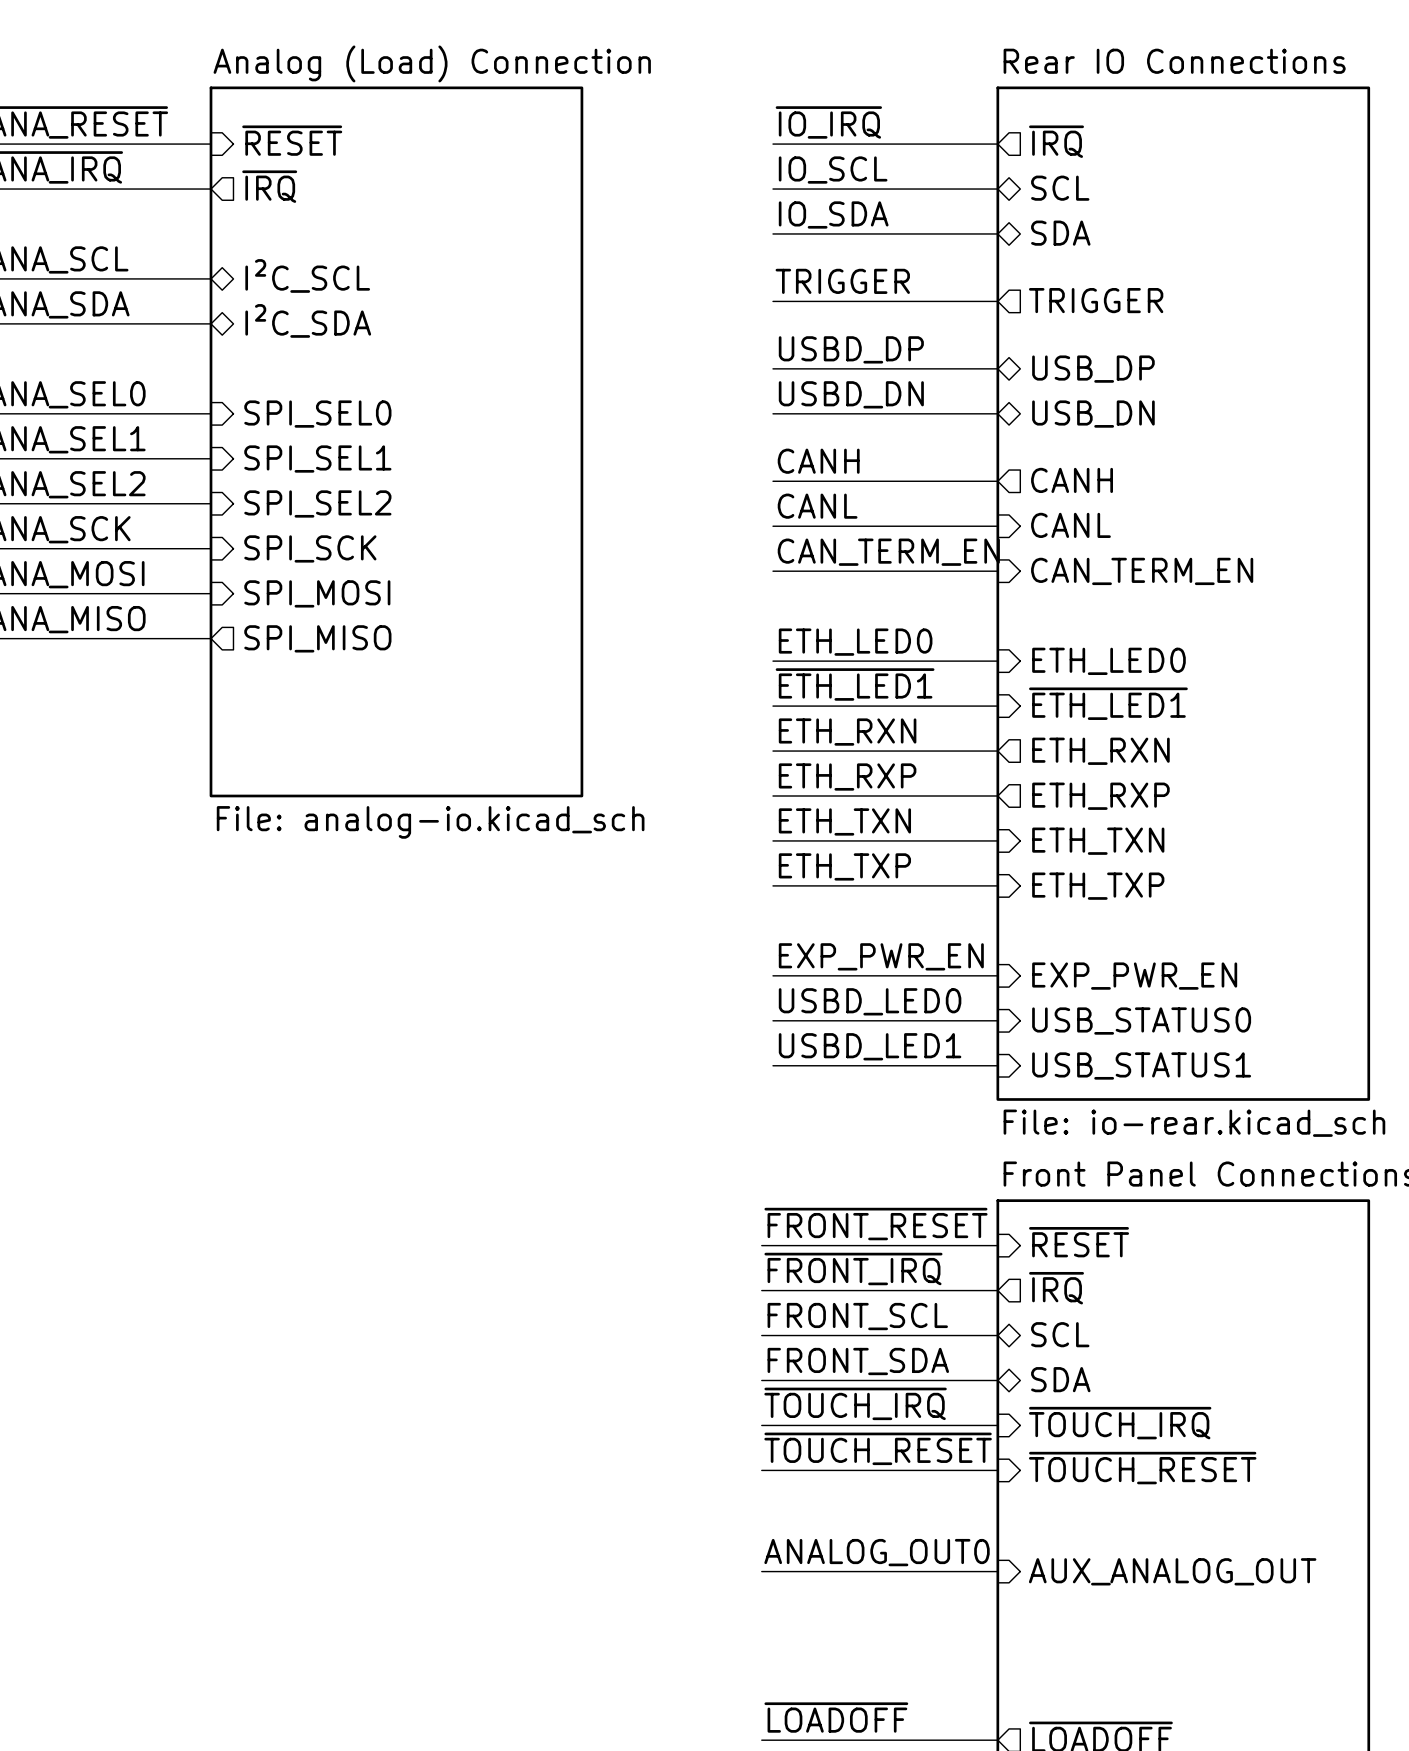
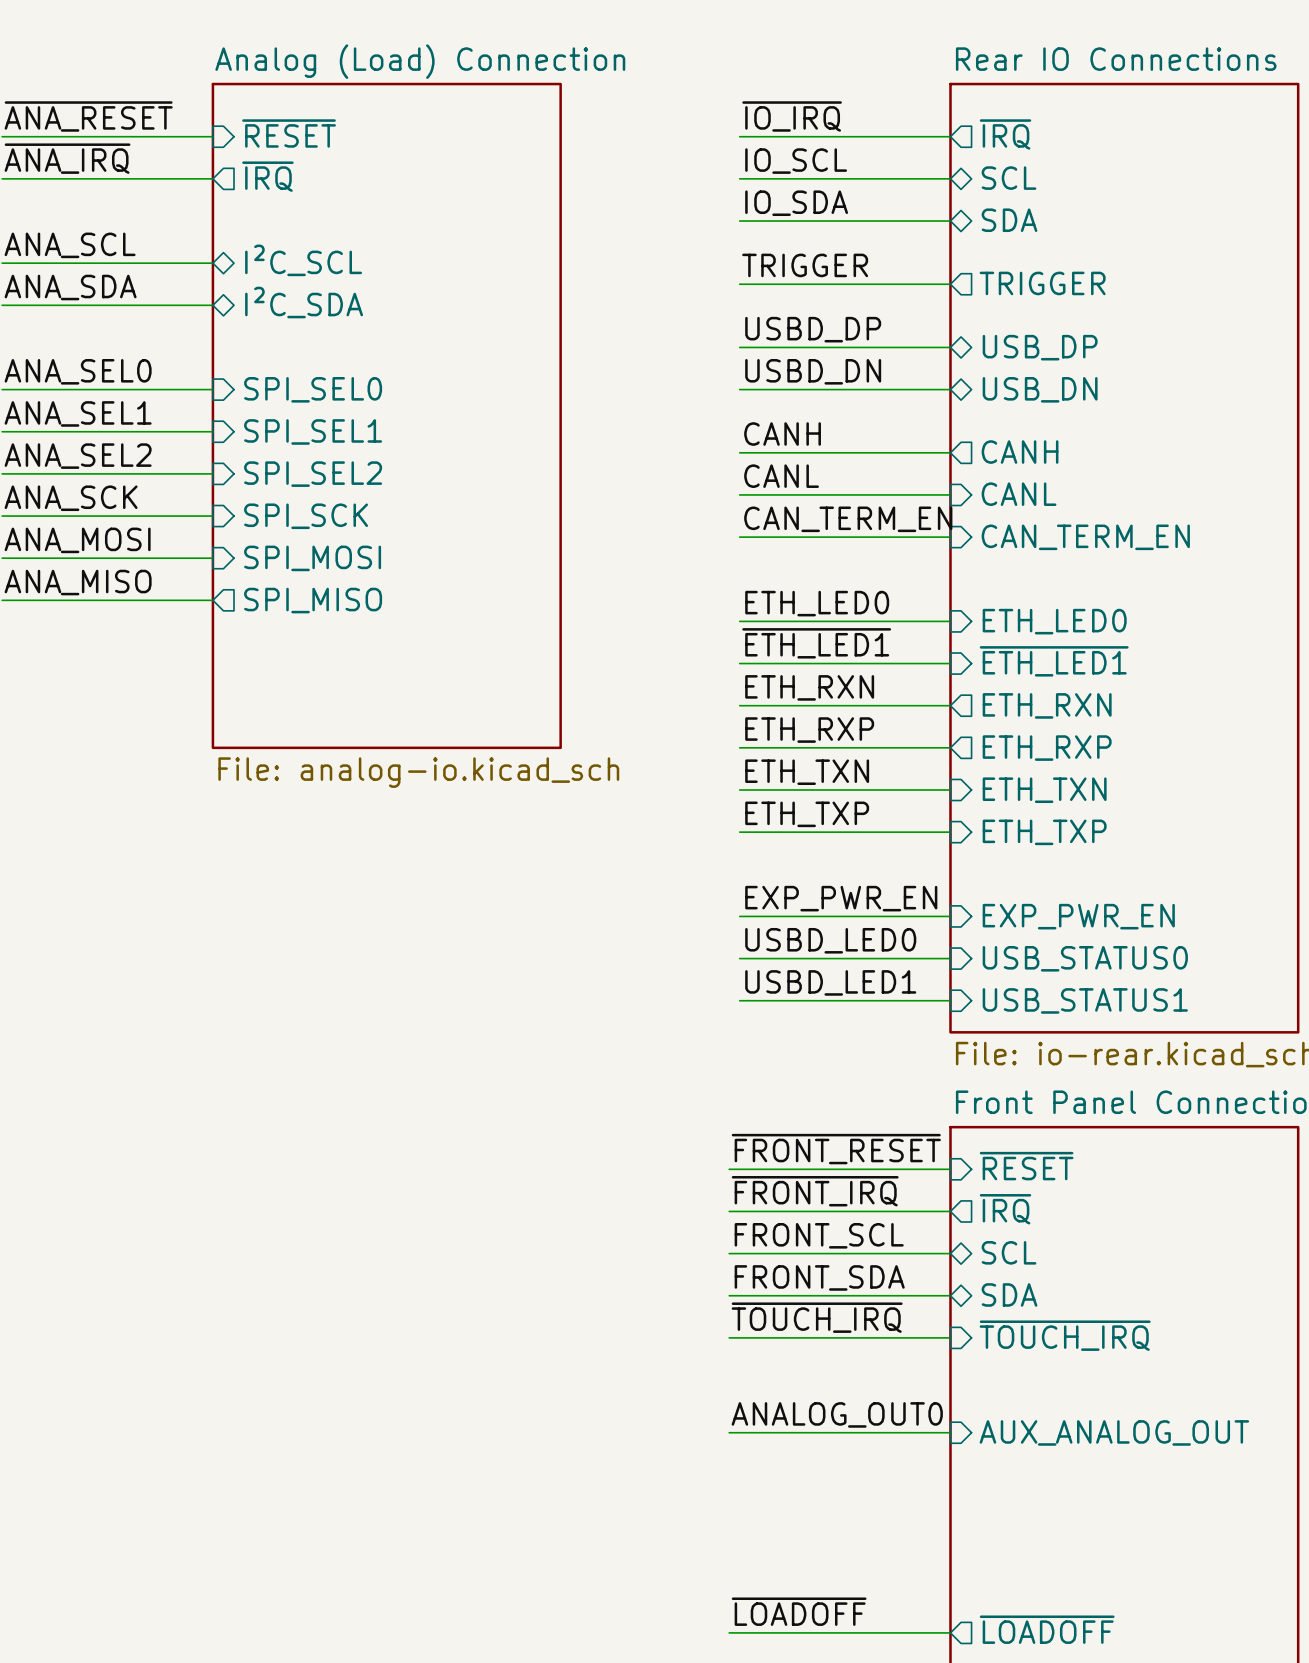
label: ~{TOUCH_RESET} (878, 1448) -> none
sheet pin: ~{TOUCH_RESET} (1142, 1468) -> none
wire: (761, 1470) (997, 1470) -> none
label position: ANALOG_OUT0 (877, 1552) -> ANALOG_OUT0 (837, 1414)
wire: (761, 1571) (997, 1571) -> (729, 1432) (950, 1432)
sheet pin position: AUX_ANALOG_OUT (1172, 1571) -> AUX_ANALOG_OUT (1114, 1432)

